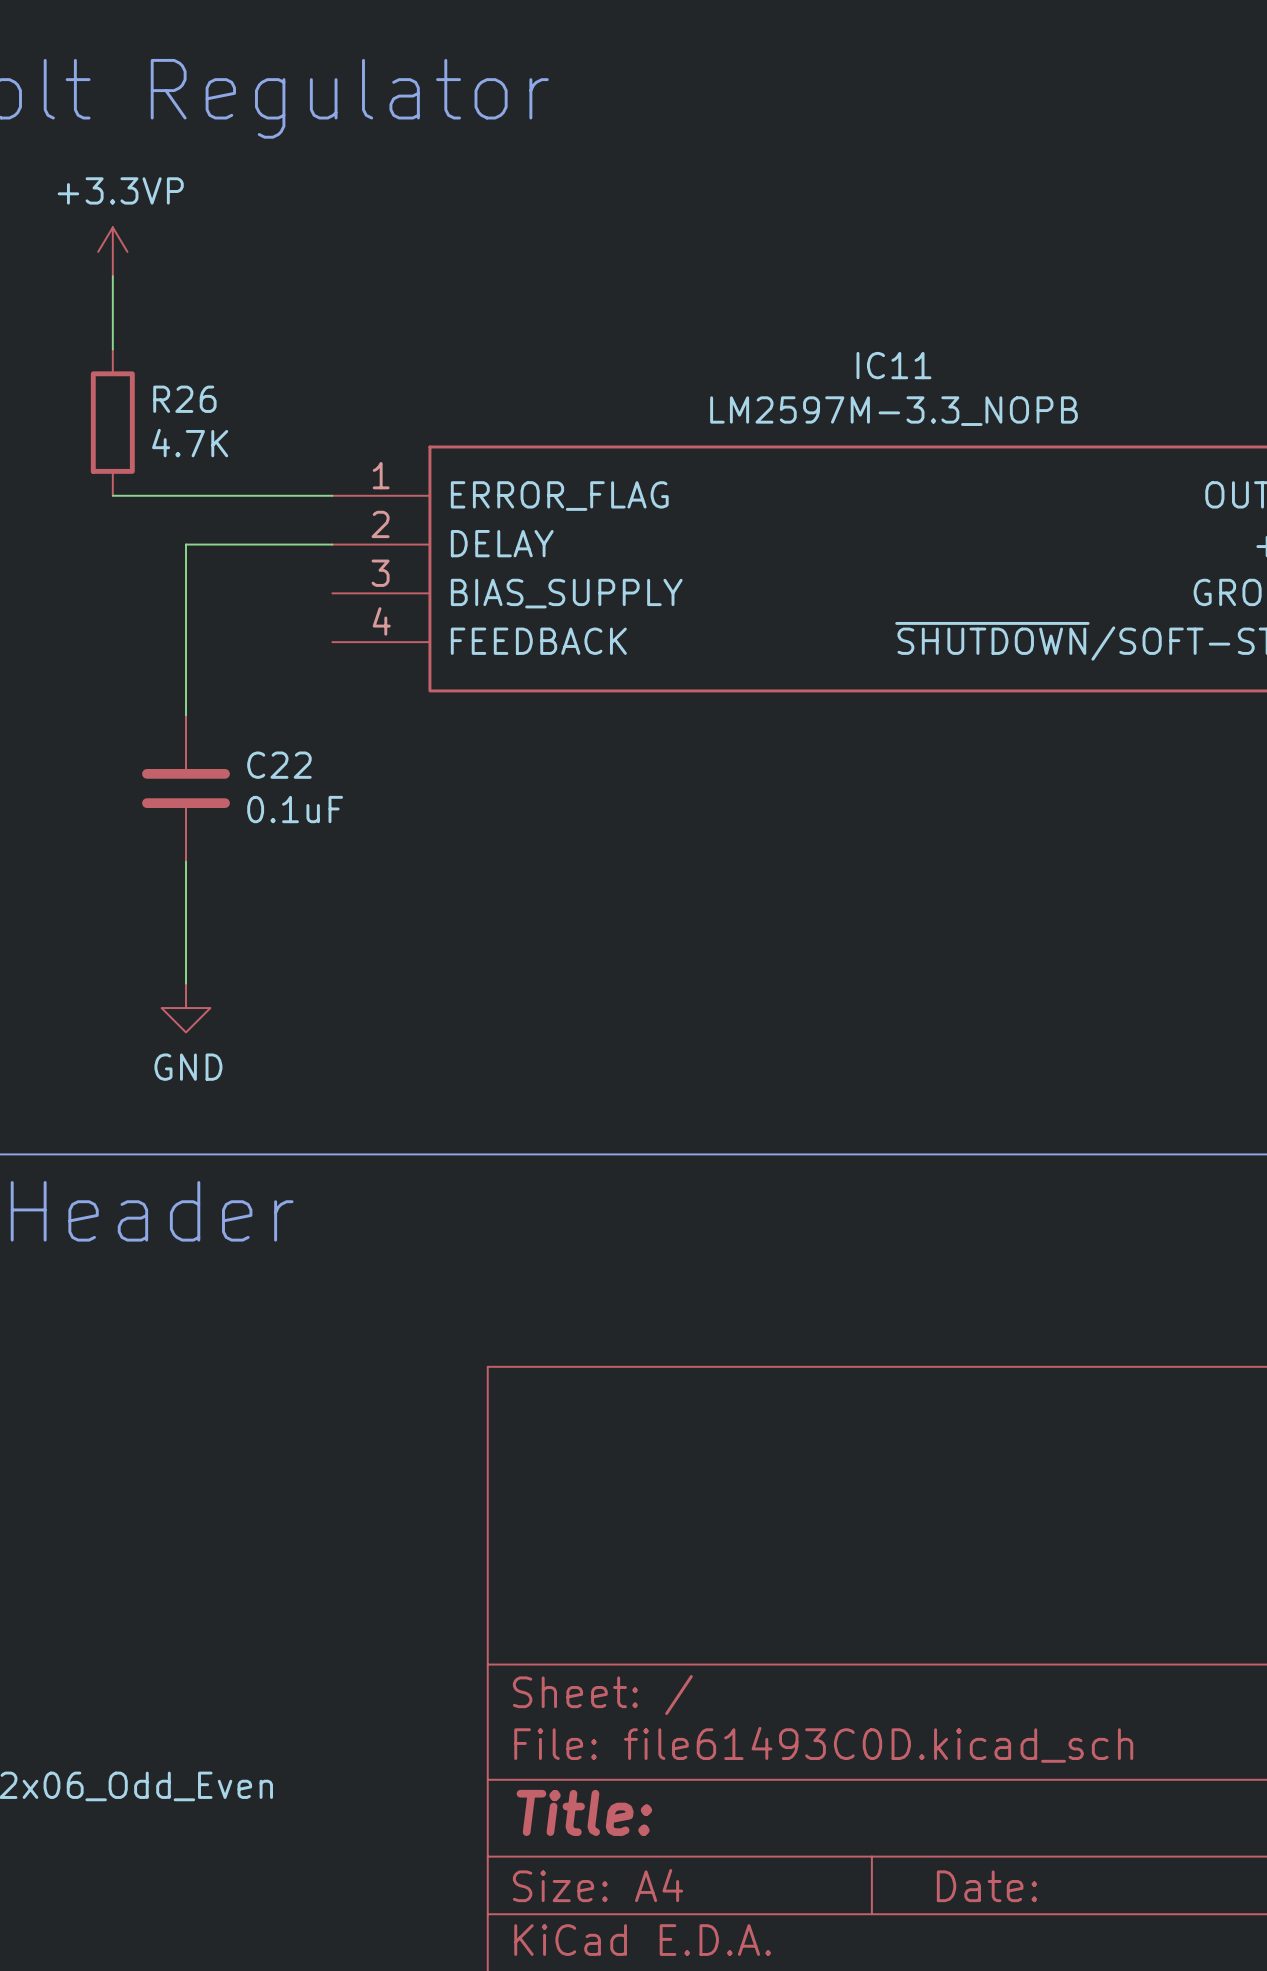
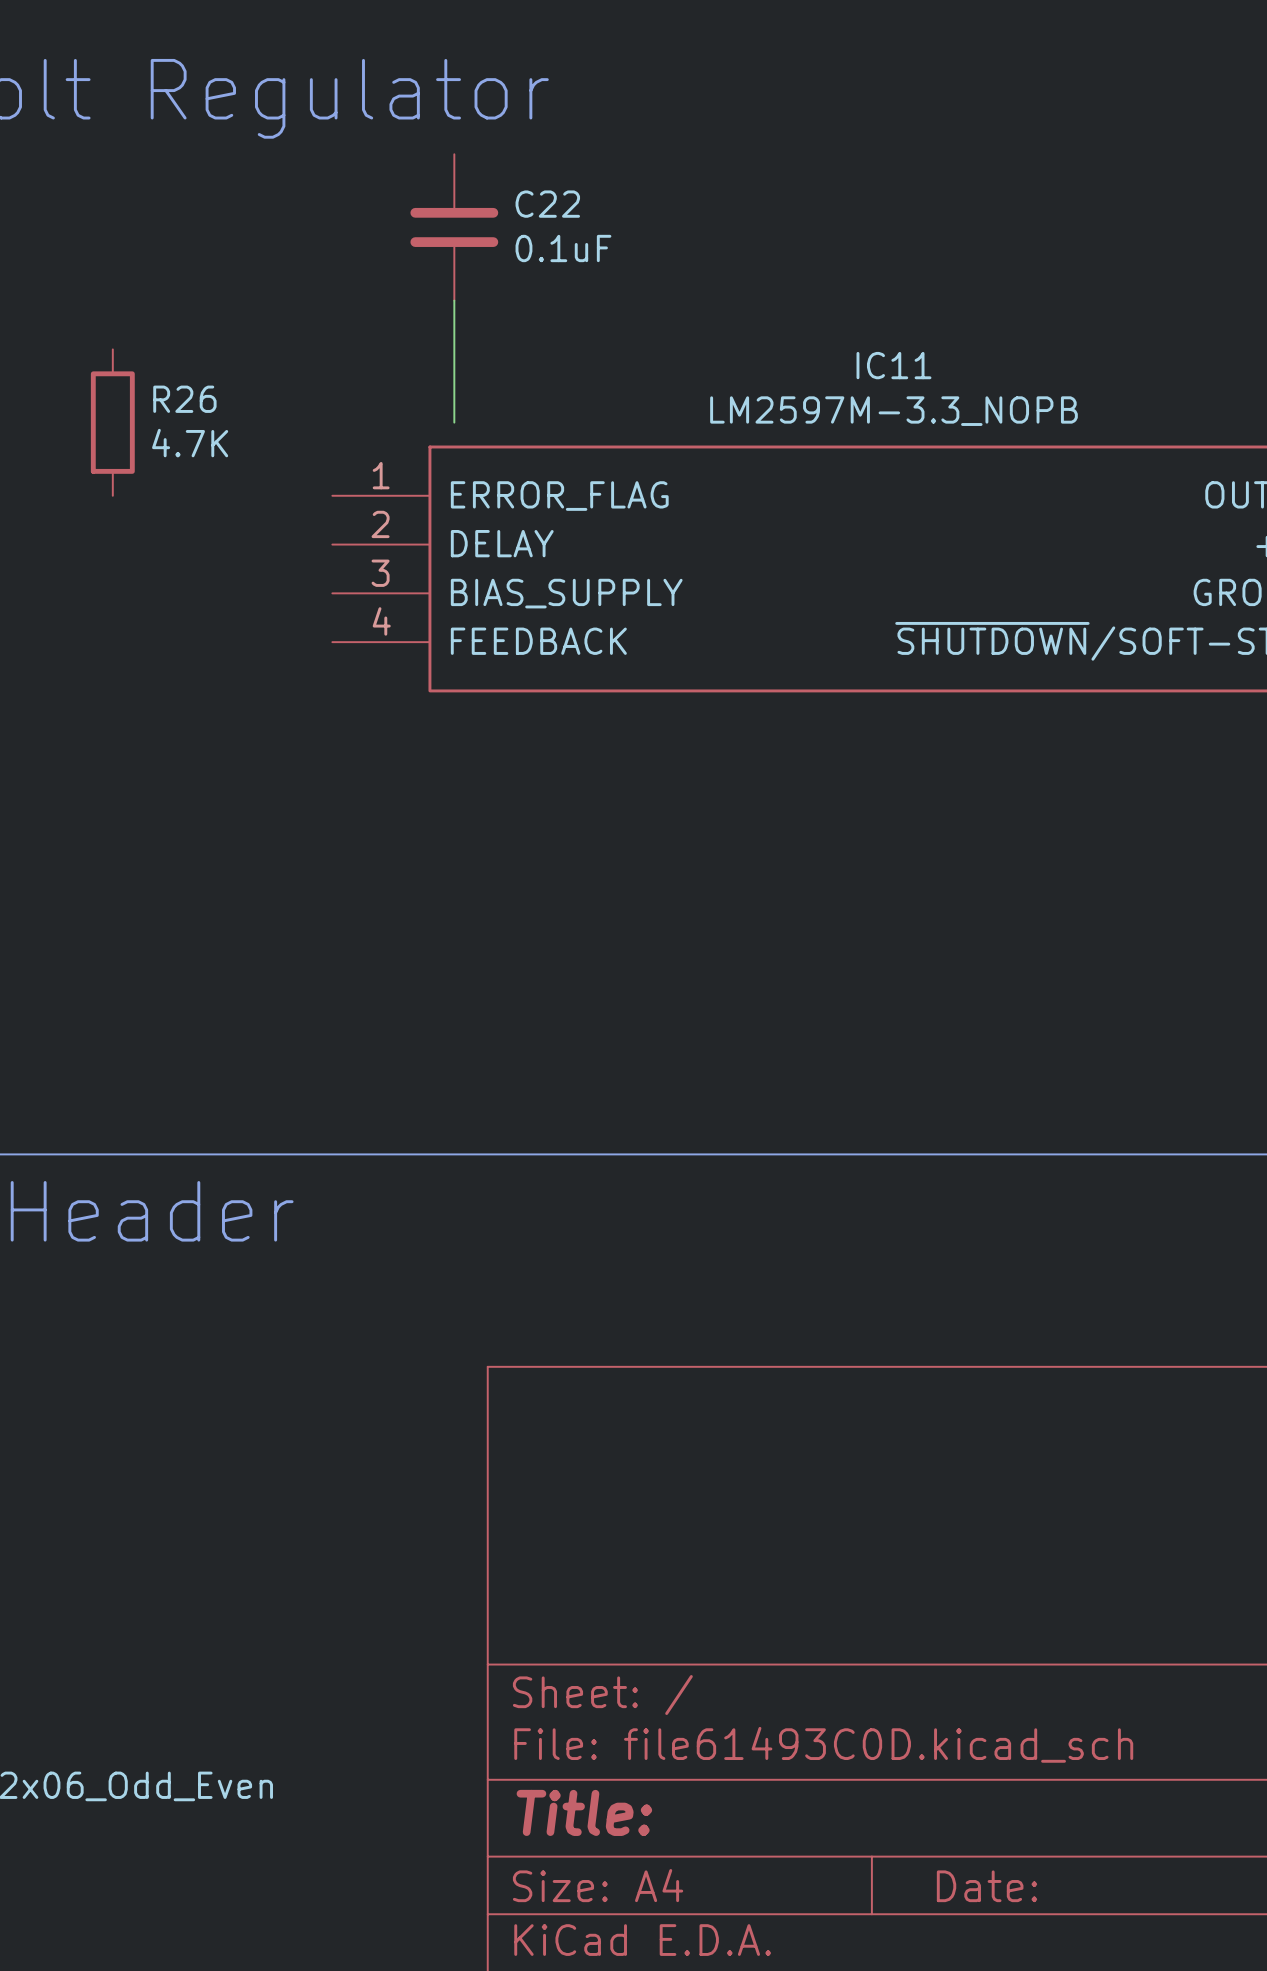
power symbol: +3.3VP (112, 251) -> none
wire: (112, 276) (112, 349) -> none
wire: none -> (454, 300) (454, 422)
wire: (112, 495) (332, 495) -> none
wire: (332, 544) (186, 544) (186, 715) -> none
C22 position: (186, 788) -> (454, 227)
wire: (186, 861) (186, 983) -> none
power symbol: GND (186, 1008) -> none

